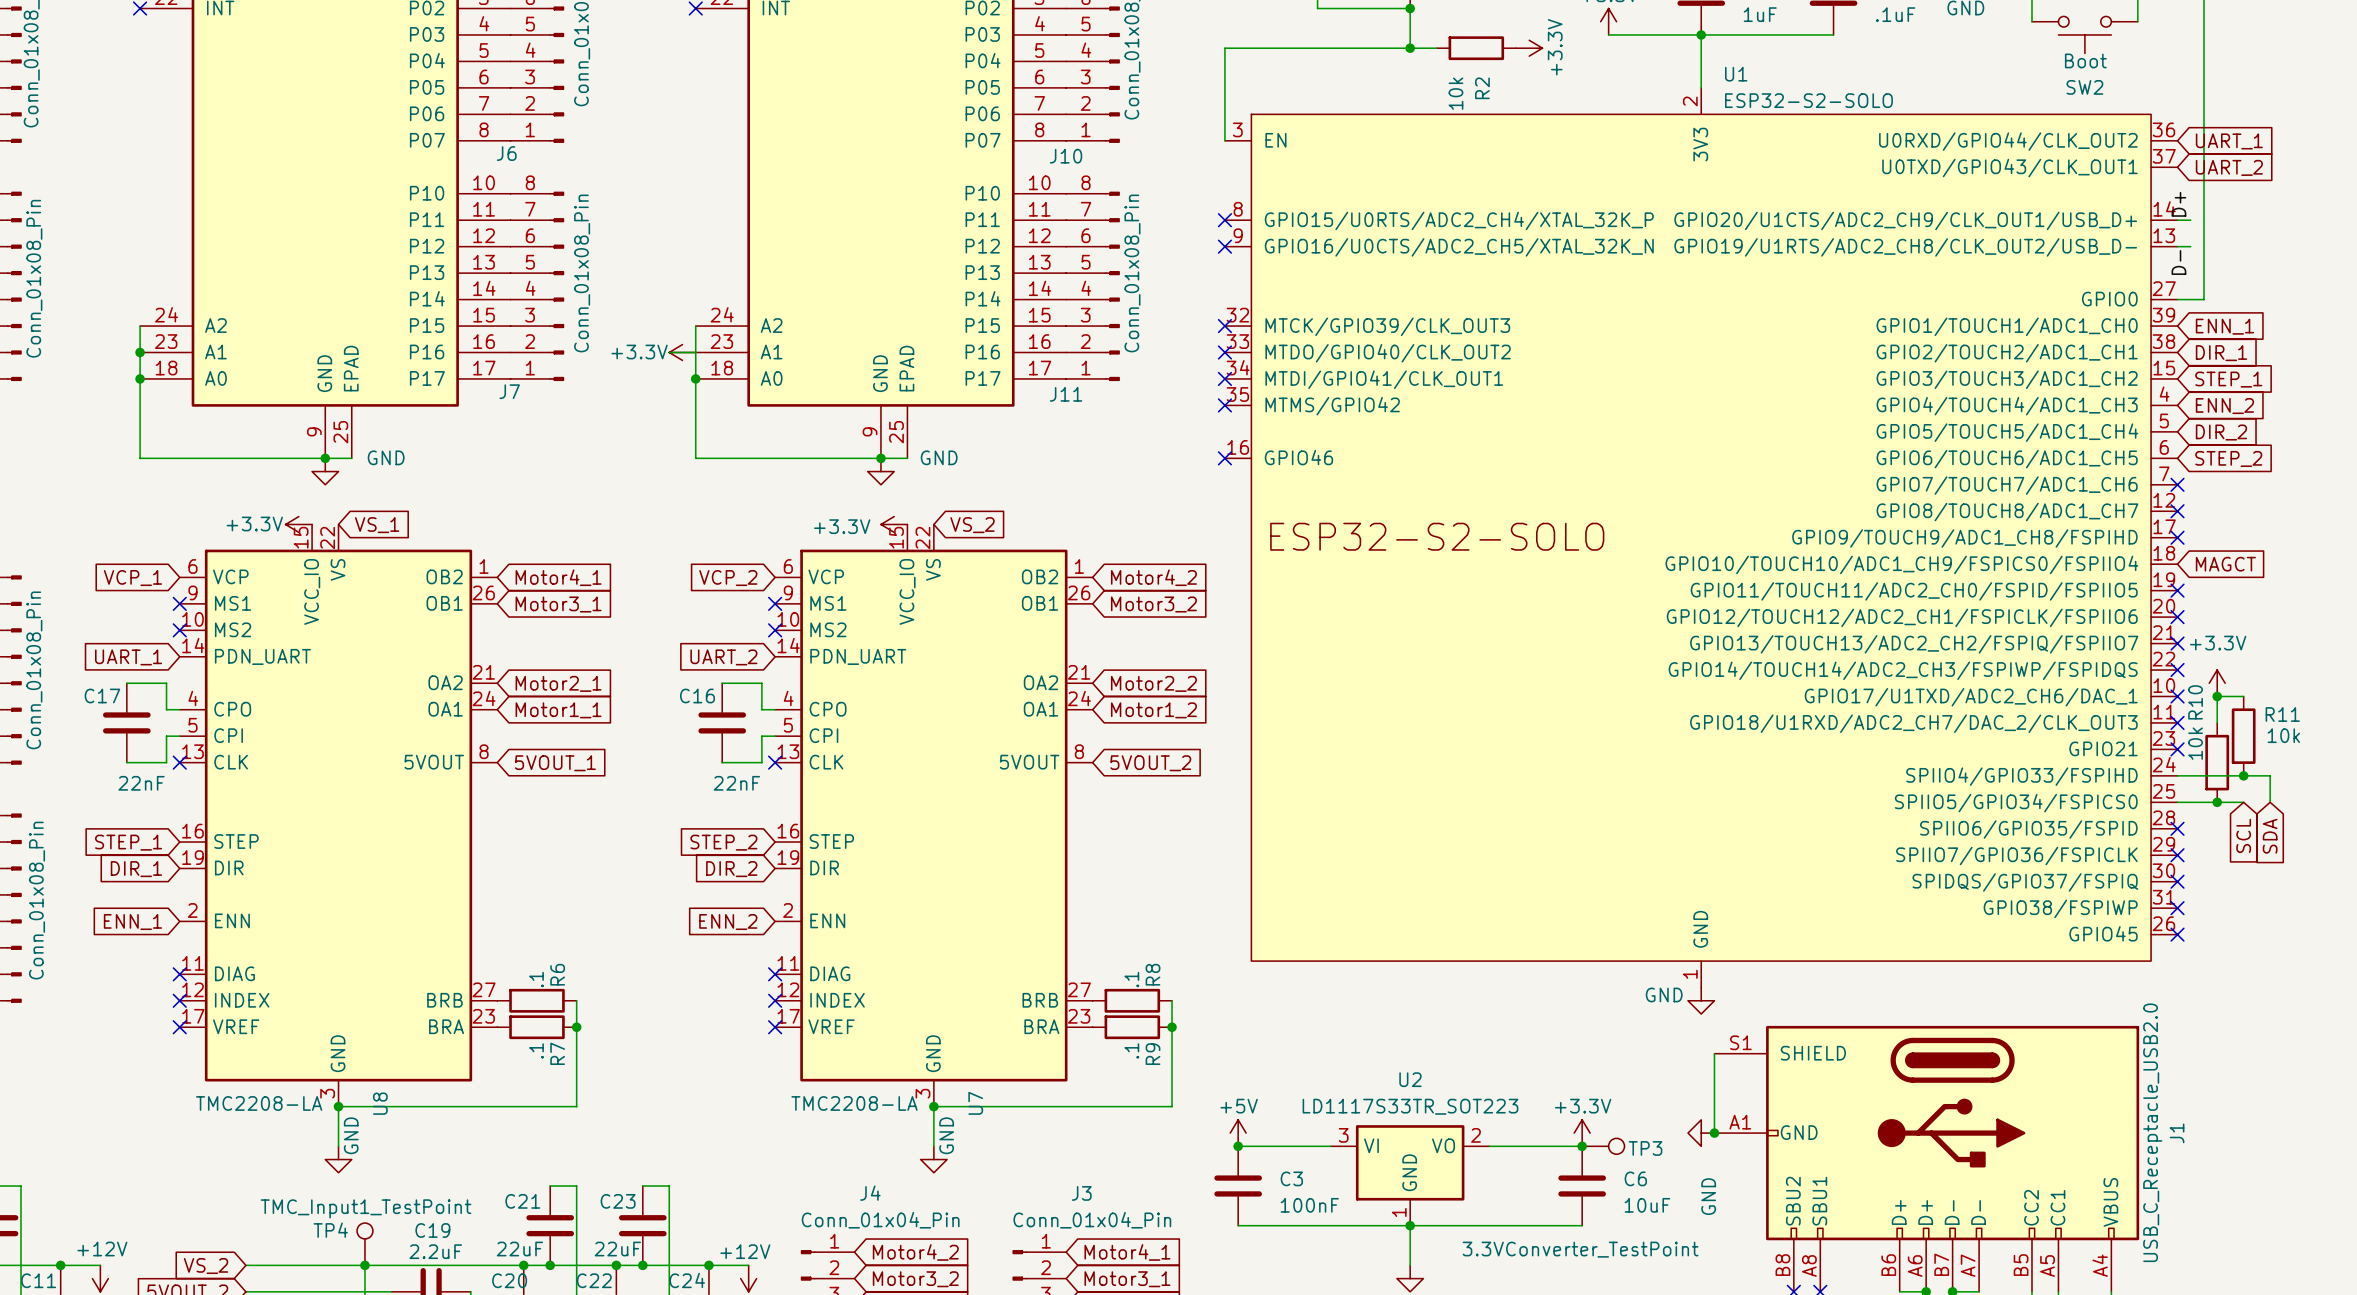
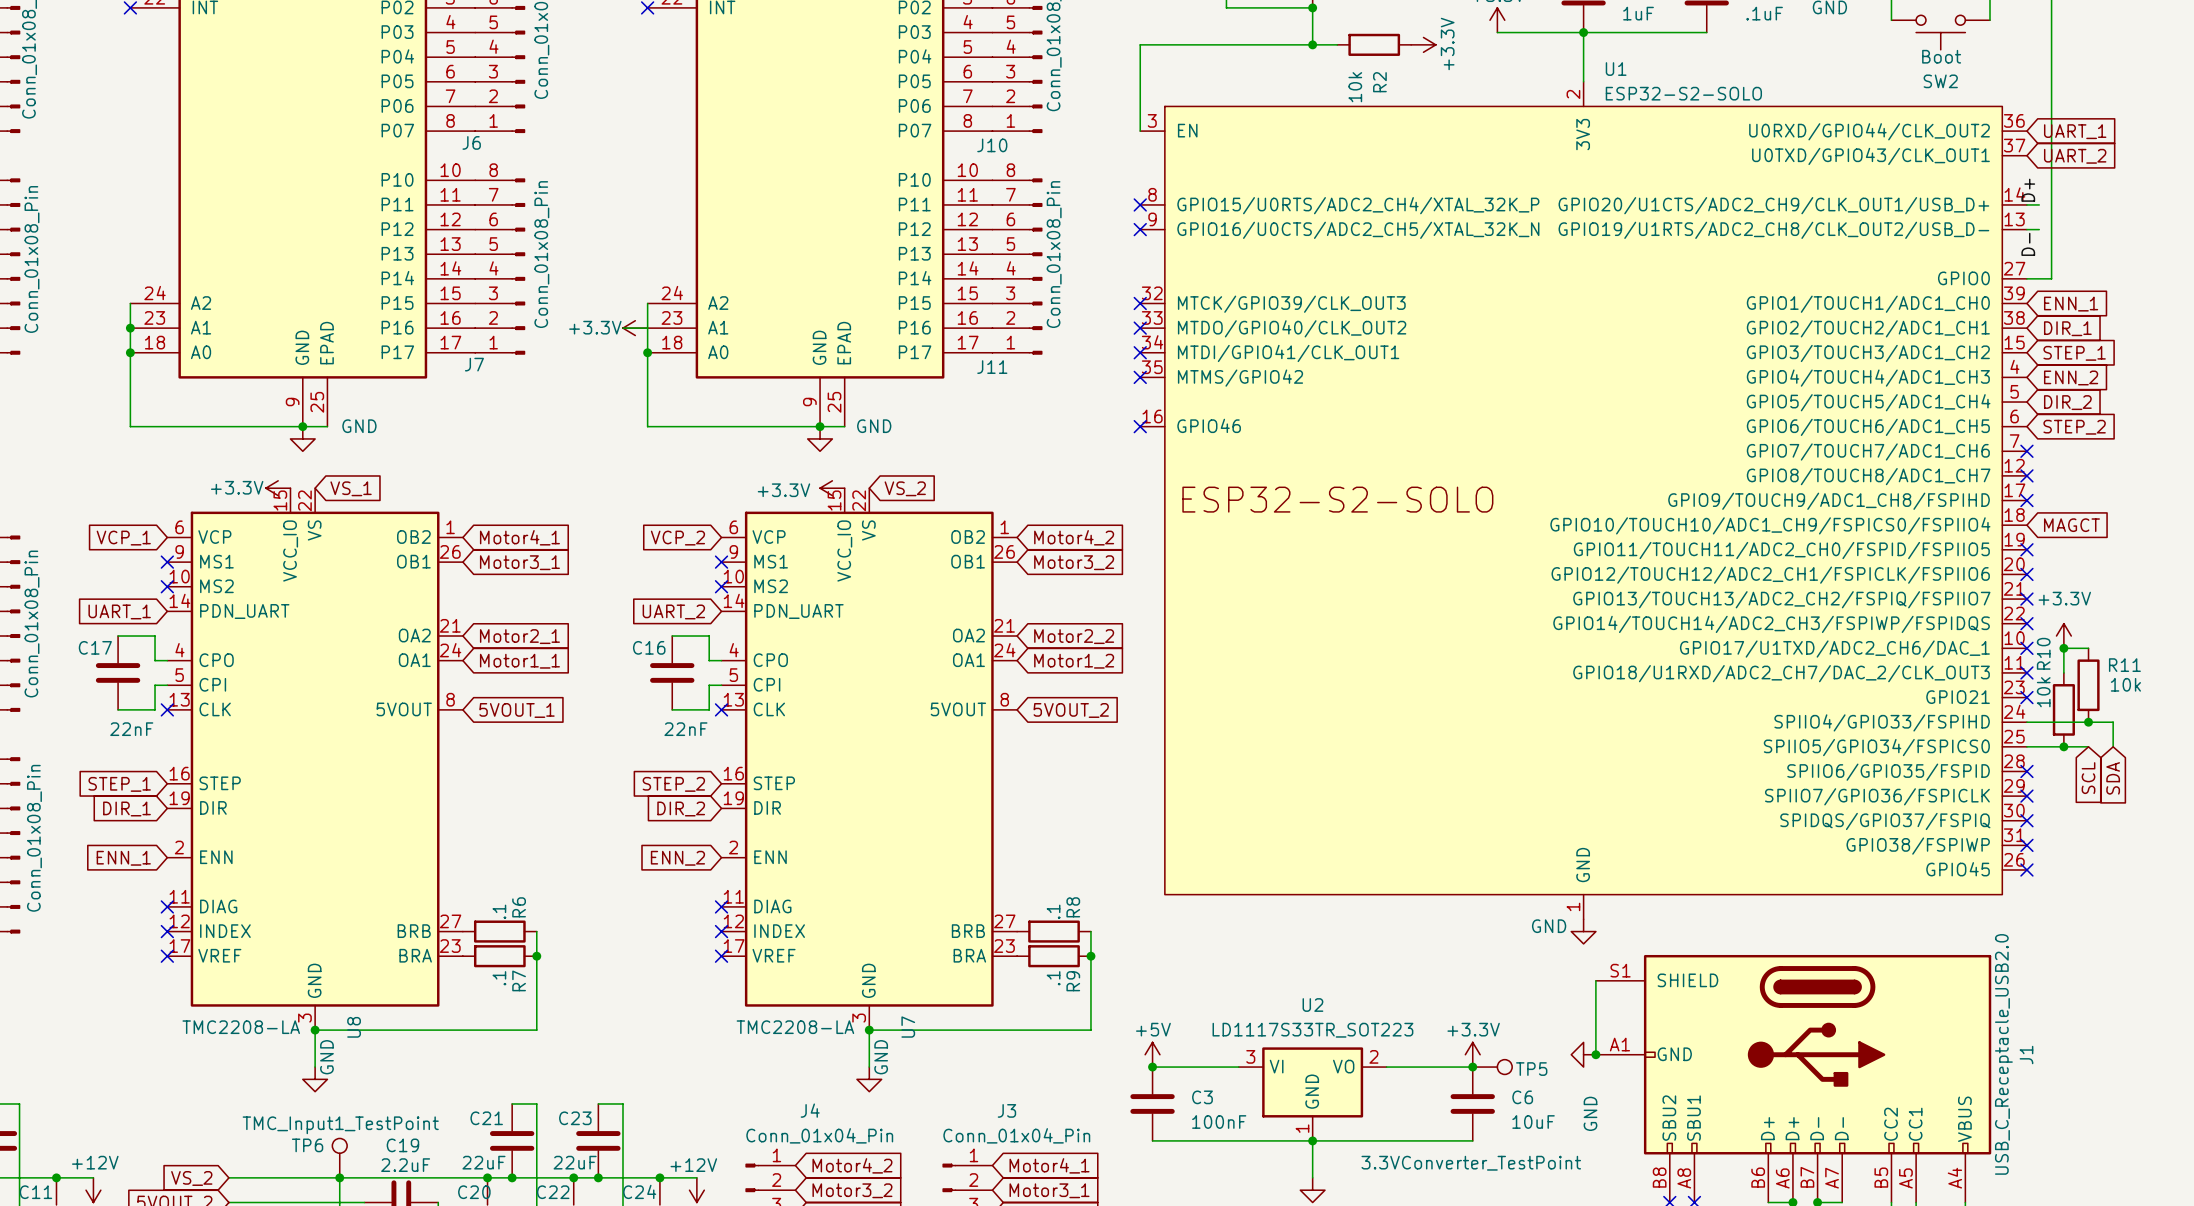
TP3 name: TP3 (1645, 1148) -> TP5 (1531, 1069)
TP4 name: TP4 (330, 1230) -> TP6 (307, 1145)

